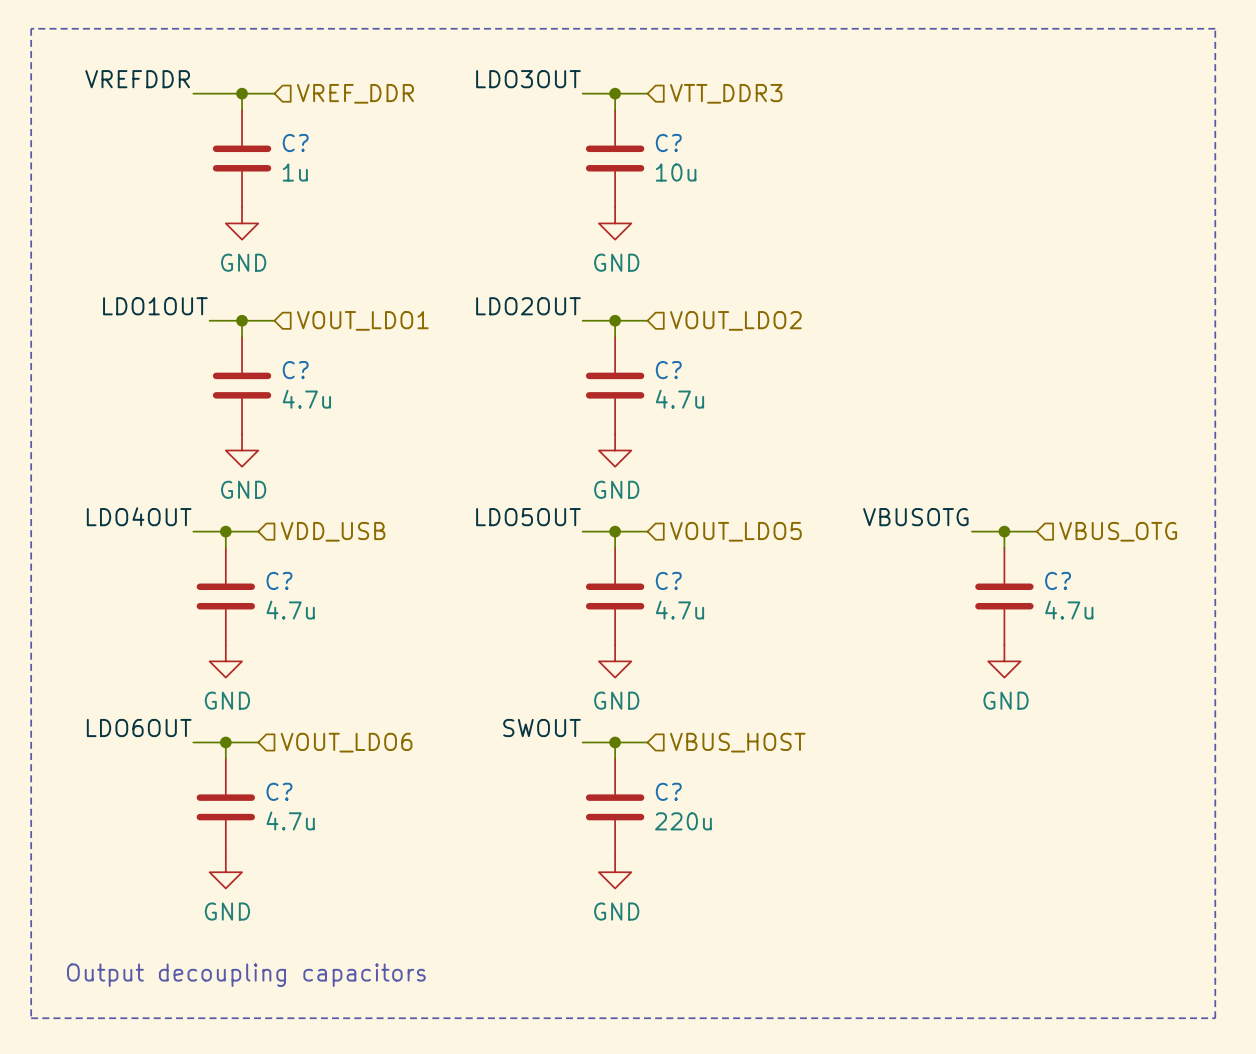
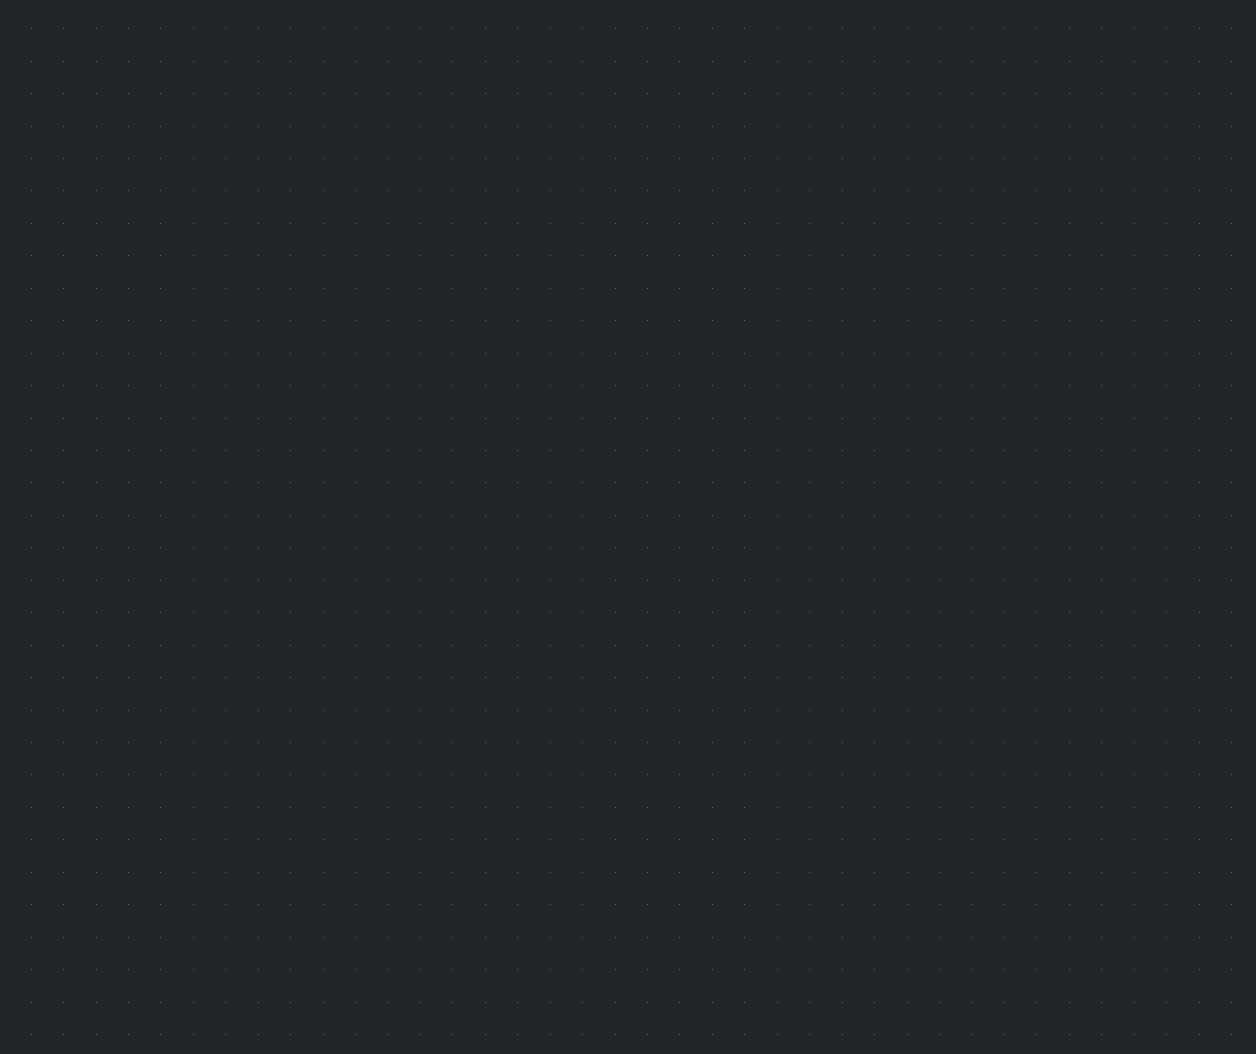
line: (31, 28) (1215, 28) (1215, 1018) (31, 1018) (31, 28) -> none
label: VREFDDR (137, 79) -> none
label: LDO3OUT (528, 79) -> none
wire: (193, 93) (274, 93) -> none
wire: (242, 93) (242, 109) -> none
junction: (242, 93) -> none
hierarchical label: VREF_DDR (355, 93) -> none
wire: (582, 93) (647, 93) -> none
wire: (615, 93) (615, 109) -> none
junction: (615, 93) -> none
hierarchical label: VTT_DDR3 (726, 93) -> none
C?: 1u (242, 158) -> none
C?: 10u (615, 158) -> none
power symbol: GND (242, 223) -> none
power symbol: GND (615, 223) -> none
label: LDO1OUT (155, 306) -> none
label: LDO2OUT (528, 306) -> none
wire: (209, 320) (274, 320) -> none
wire: (242, 320) (242, 336) -> none
junction: (242, 320) -> none
hierarchical label: VOUT_LDO1 (362, 320) -> none
wire: (582, 320) (647, 320) -> none
wire: (615, 320) (615, 336) -> none
junction: (615, 320) -> none
hierarchical label: VOUT_LDO2 (735, 320) -> none
C?: 4.7u (242, 385) -> none
C?: 4.7u (615, 385) -> none
power symbol: GND (242, 450) -> none
power symbol: GND (615, 450) -> none
label: LDO4OUT (139, 516) -> none
label: LDO5OUT (528, 517) -> none
label: VBUSOTG (915, 517) -> none
wire: (193, 531) (258, 531) -> none
wire: (225, 531) (225, 547) -> none
junction: (225, 531) -> none
hierarchical label: VDD_USB (333, 531) -> none
wire: (582, 531) (647, 531) -> none
wire: (615, 531) (615, 547) -> none
junction: (615, 531) -> none
hierarchical label: VOUT_LDO5 (735, 531) -> none
wire: (971, 531) (1036, 531) -> none
wire: (1004, 531) (1004, 547) -> none
junction: (1004, 531) -> none
hierarchical label: VBUS_OTG (1118, 531) -> none
C?: 4.7u (225, 596) -> none
C?: 4.7u (615, 596) -> none
C?: 4.7u (1004, 596) -> none
power symbol: GND (225, 661) -> none
power symbol: GND (615, 661) -> none
power symbol: GND (1004, 661) -> none
label: LDO6OUT (139, 728) -> none
label: SWOUT (542, 728) -> none
wire: (193, 742) (258, 742) -> none
wire: (225, 742) (225, 758) -> none
junction: (225, 742) -> none
hierarchical label: VOUT_LDO6 (346, 742) -> none
wire: (582, 742) (647, 742) -> none
wire: (615, 742) (615, 758) -> none
junction: (615, 742) -> none
hierarchical label: VBUS_HOST (737, 742) -> none
C?: 4.7u (225, 807) -> none
C?: 220u (615, 807) -> none
power symbol: GND (225, 872) -> none
power symbol: GND (615, 872) -> none
text: Output decoupling capacitors (246, 975) -> none

